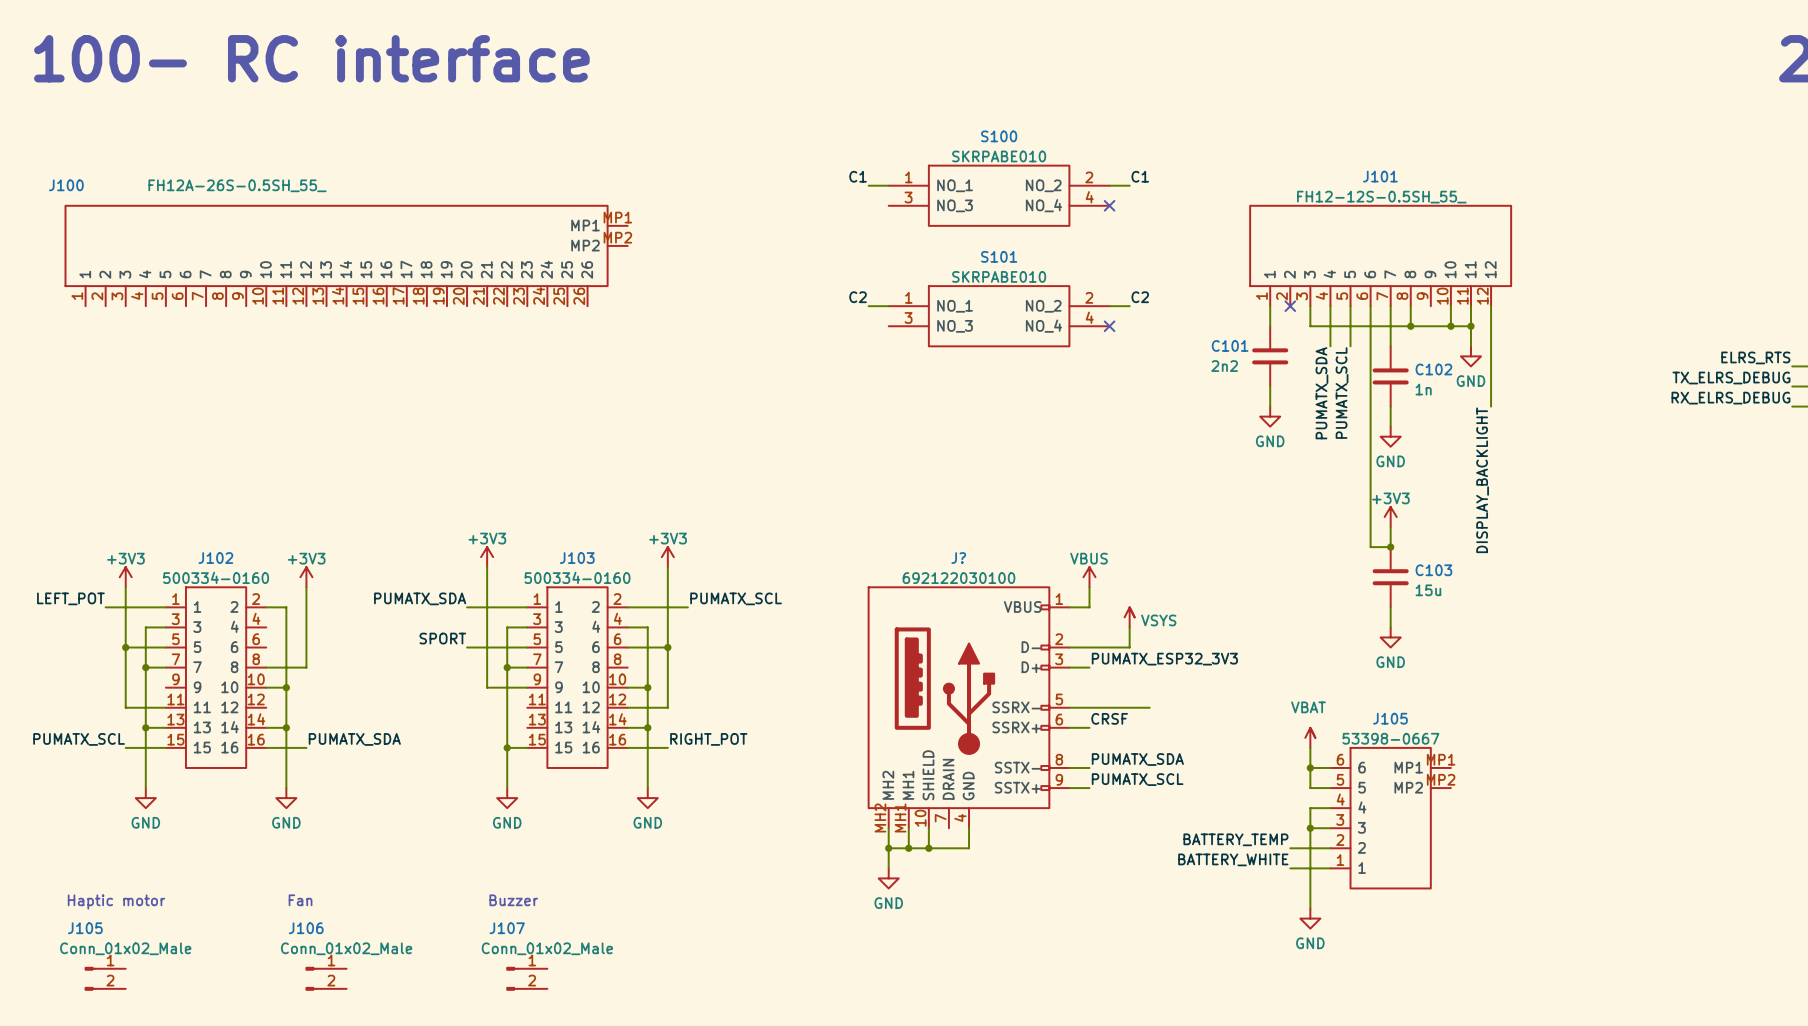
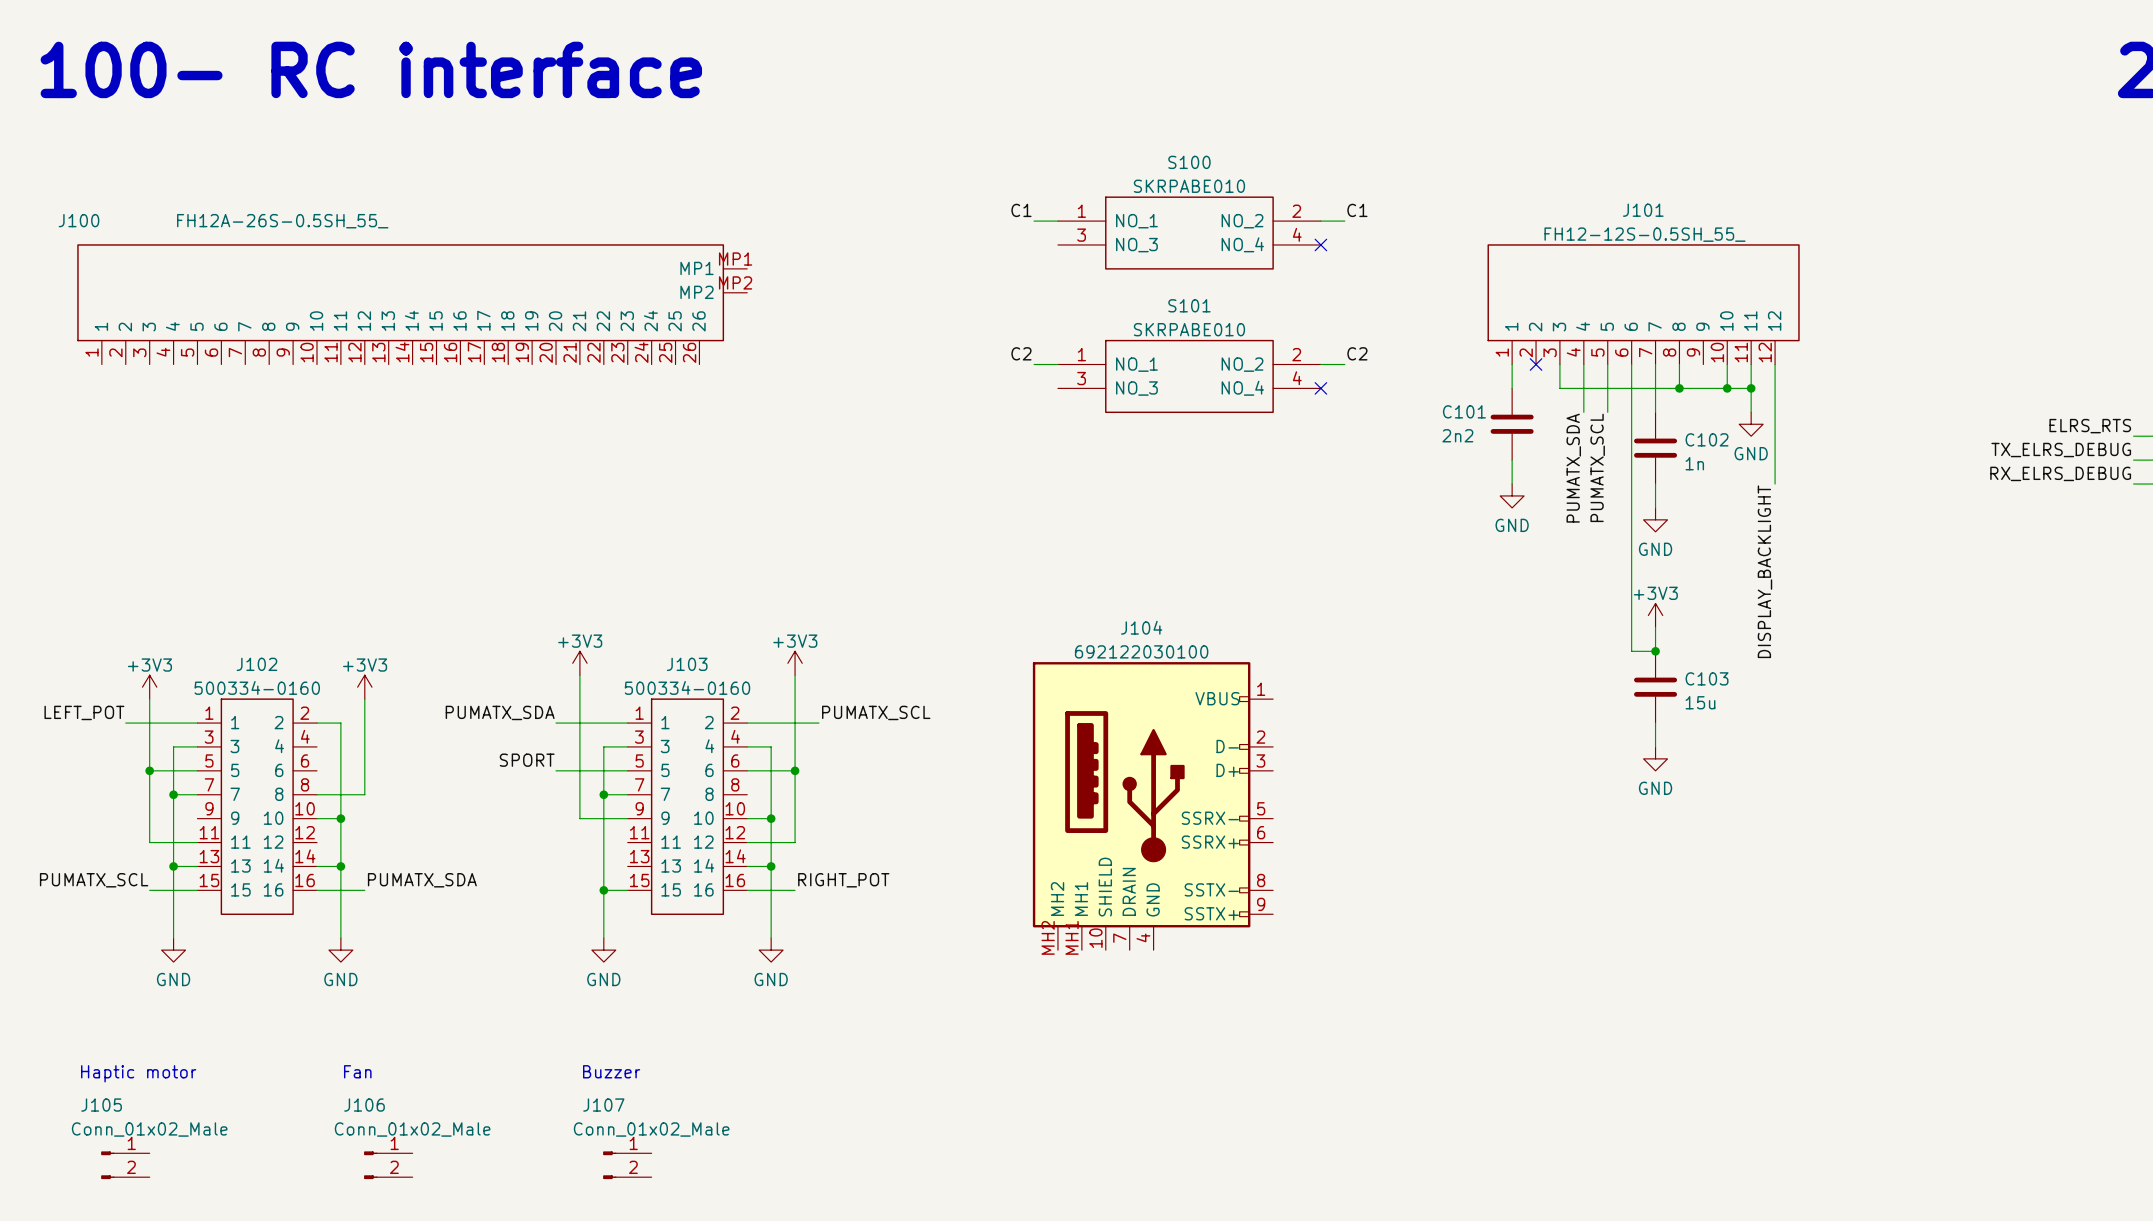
power symbol: VBUS (1089, 577) -> none
wire: (1089, 587) (1089, 607) (1069, 607) -> none
power symbol: VSYS (1129, 617) -> none
wire: (1129, 627) (1129, 647) (1069, 647) -> none
label: PUMATX_ESP32_3V3 (1164, 659) -> none
wire: (1069, 667) (1089, 667) -> none
J104: none -> 692122030100 (1152, 806)
J?: 692122030100 (968, 707) -> none
wire: (1069, 707) (1149, 707) -> none
label: CRSF (1109, 718) -> none
wire: (1069, 727) (1089, 727) -> none
power symbol: VBAT (1310, 737) -> none
wire: (1310, 747) (1310, 788) (1330, 788) -> none
label: PUMATX_SDA (1137, 759) -> none
wire: (1069, 767) (1089, 767) -> none
wire: (1310, 767) (1330, 767) -> none
junction: (1310, 767) -> none
label: PUMATX_SCL (1137, 779) -> none
wire: (1069, 788) (1089, 788) -> none
wire: (1330, 808) (1310, 808) (1310, 908) -> none
J105: 53398-0667 (1390, 818) -> none
wire: (888, 828) (888, 868) -> none
wire: (908, 828) (908, 848) -> none
wire: (928, 828) (928, 848) -> none
wire: (969, 828) (969, 848) (888, 848) -> none
wire: (1310, 828) (1330, 828) -> none
junction: (1310, 828) -> none
label: BATTERY_TEMP (1235, 839) -> none
junction: (888, 848) -> none
junction: (908, 848) -> none
junction: (928, 848) -> none
wire: (1290, 848) (1330, 848) -> none
label: BATTERY_WHITE (1233, 859) -> none
wire: (1290, 868) (1330, 868) -> none
power symbol: GND (888, 878) -> none
power symbol: GND (1310, 918) -> none

